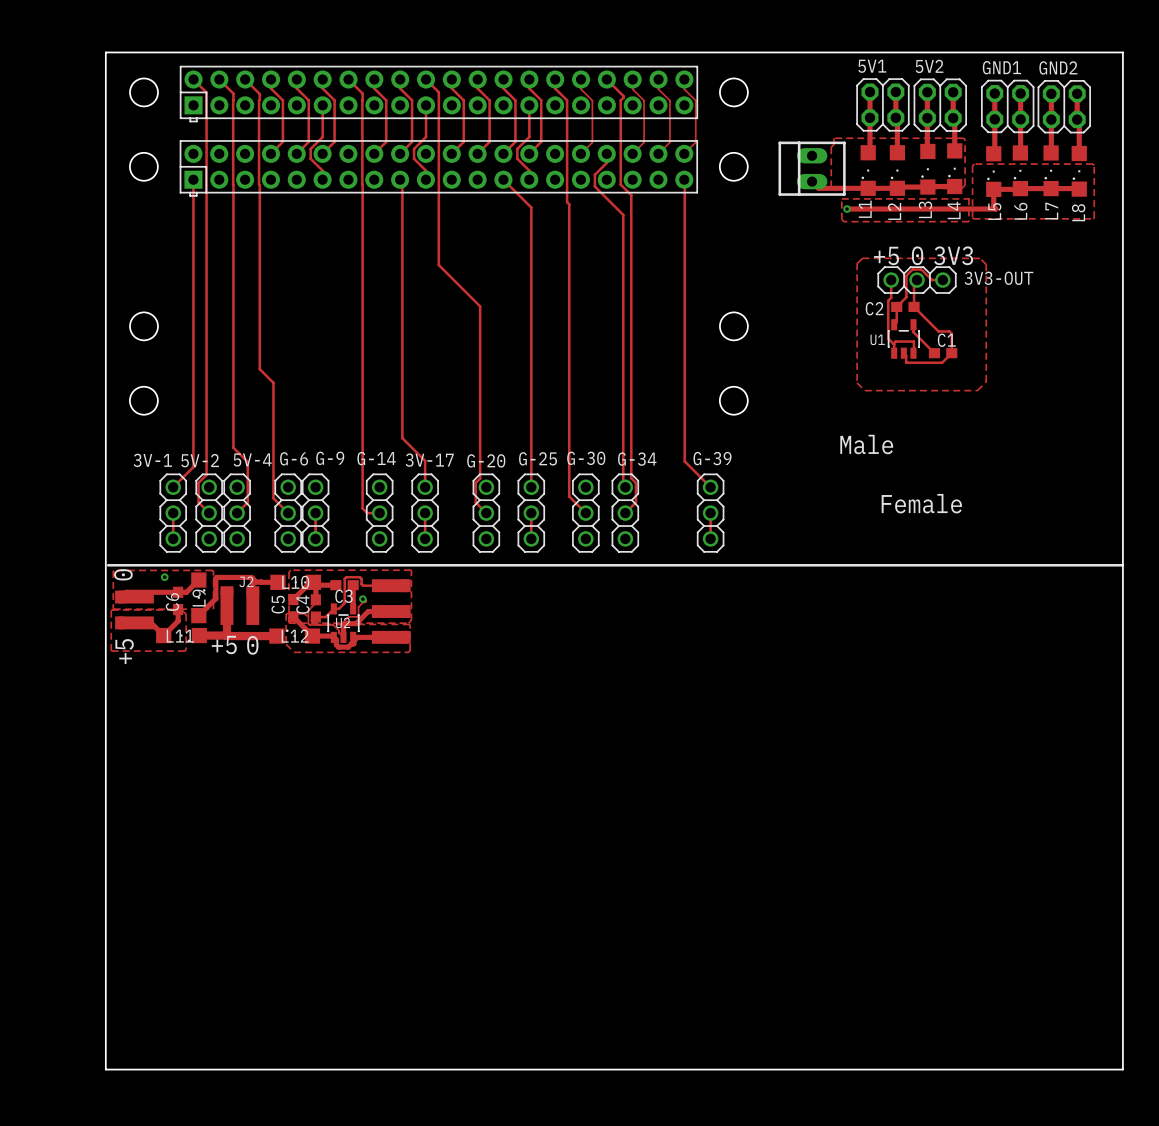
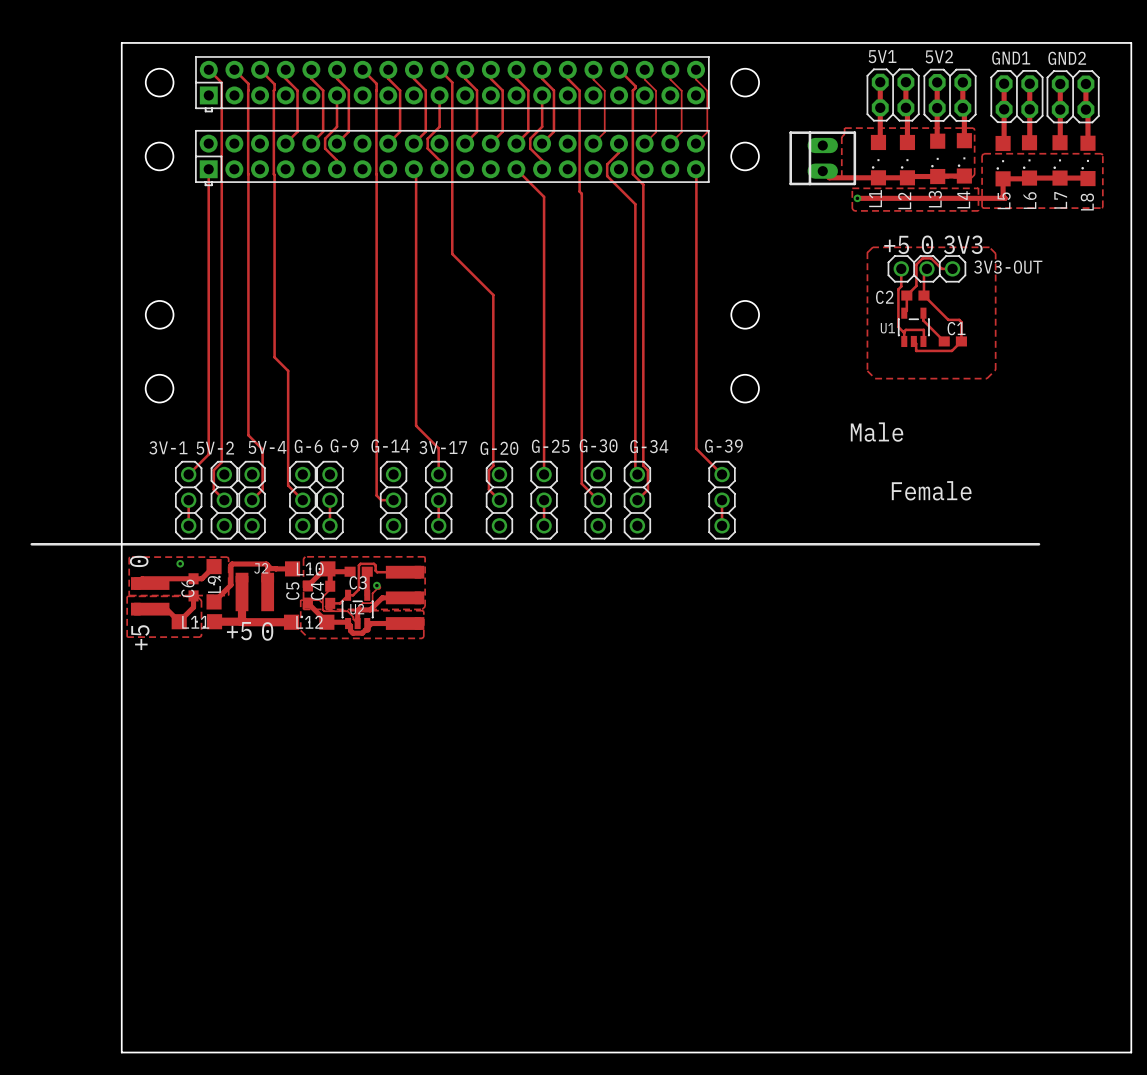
line: (108, 565) (1122, 565) -> (31, 544) (1038, 544)

